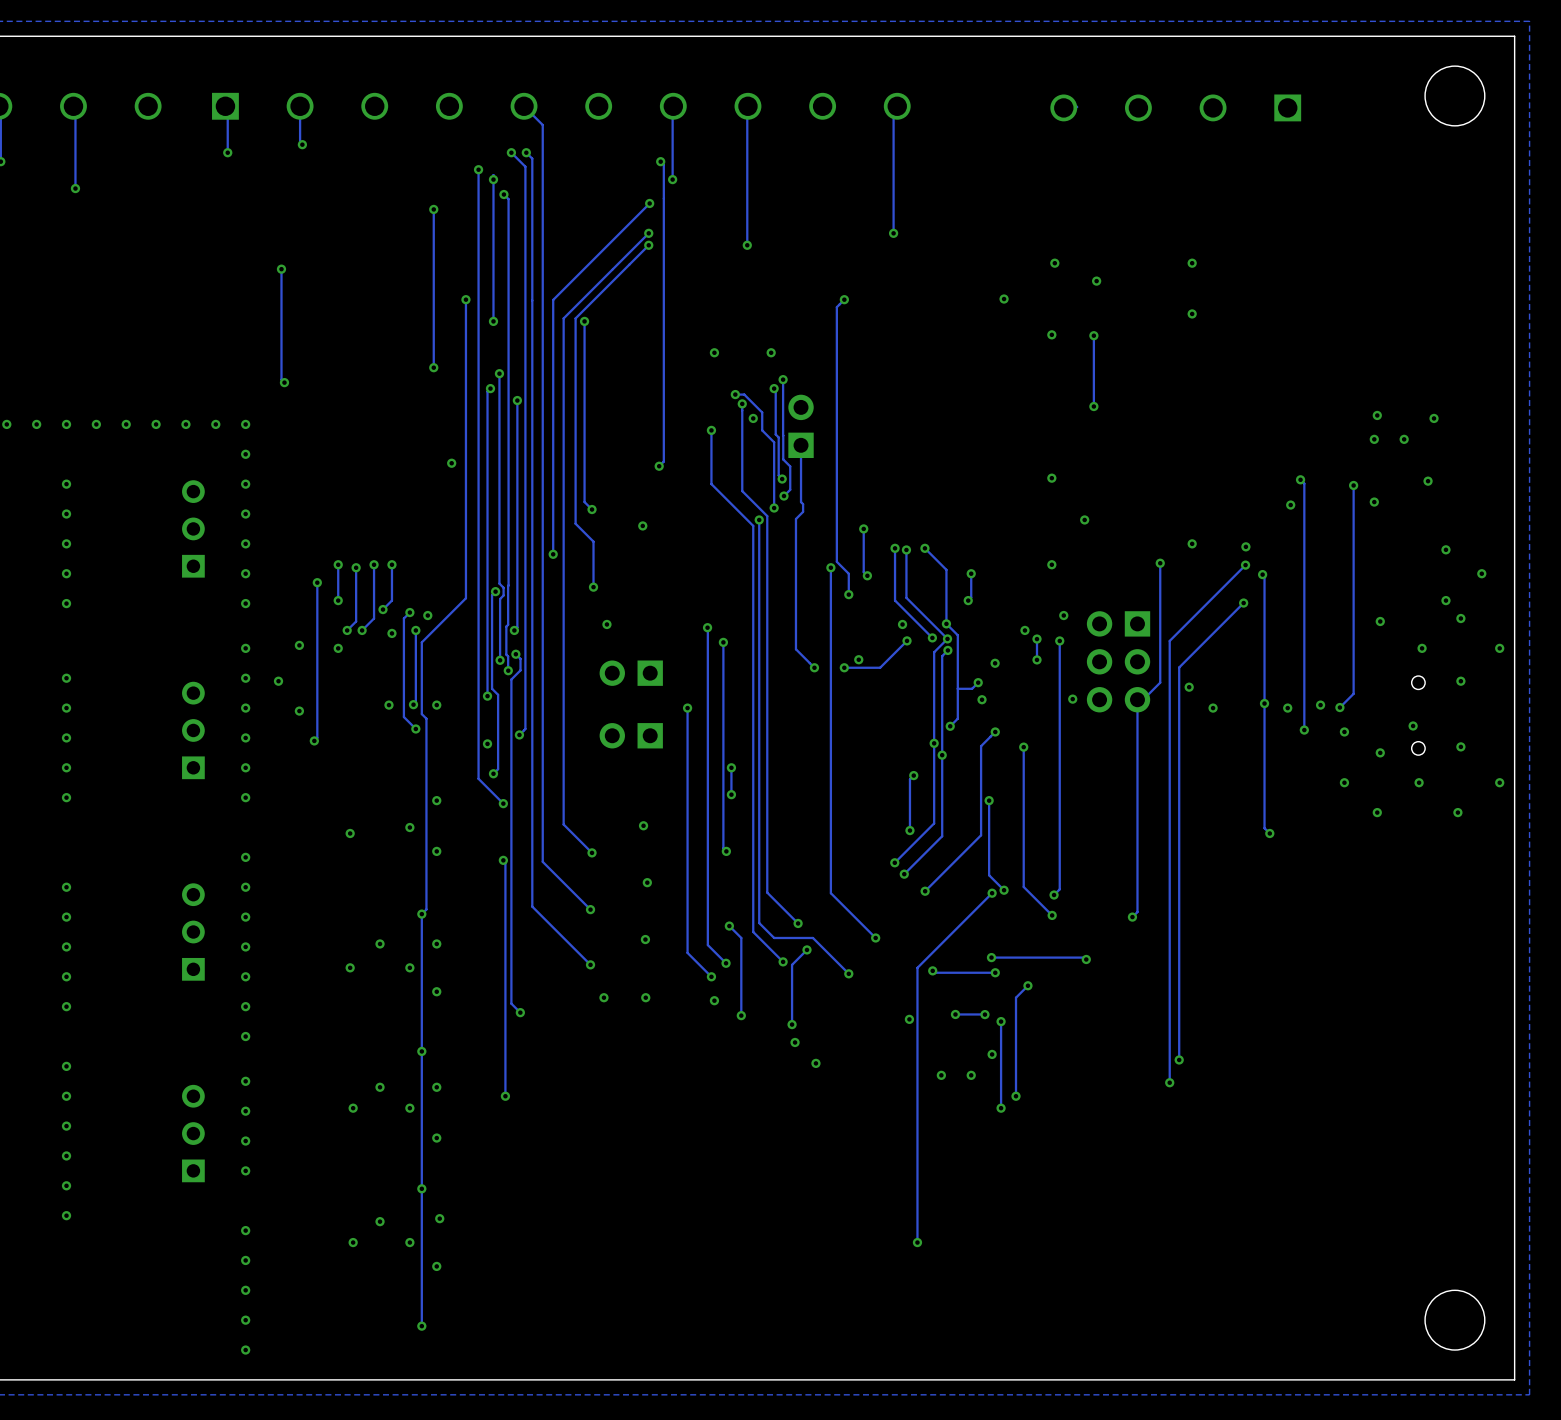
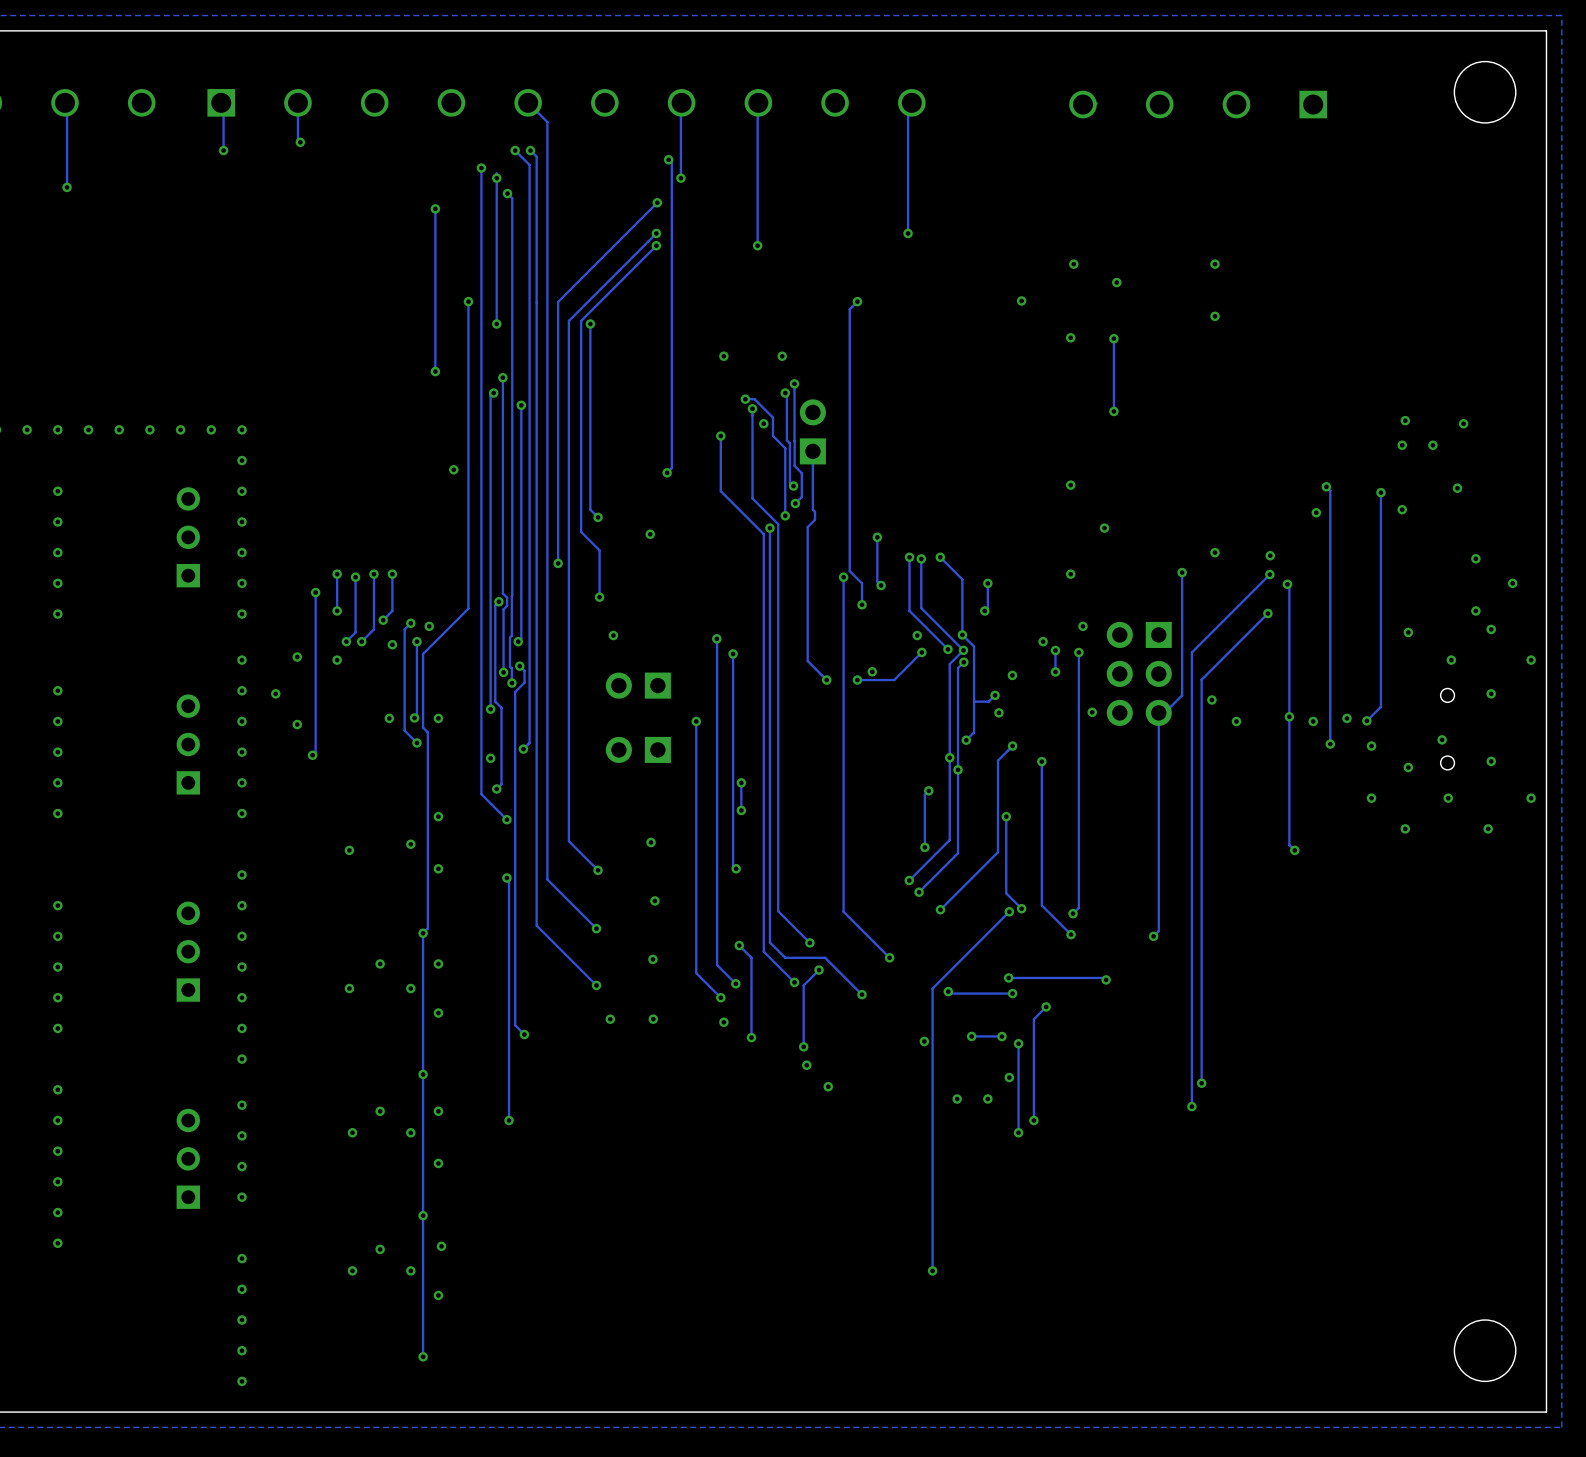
track: (281, 269) (281, 379) (284, 382) -> none
via: (281, 269) -> none
via: (284, 382) -> none

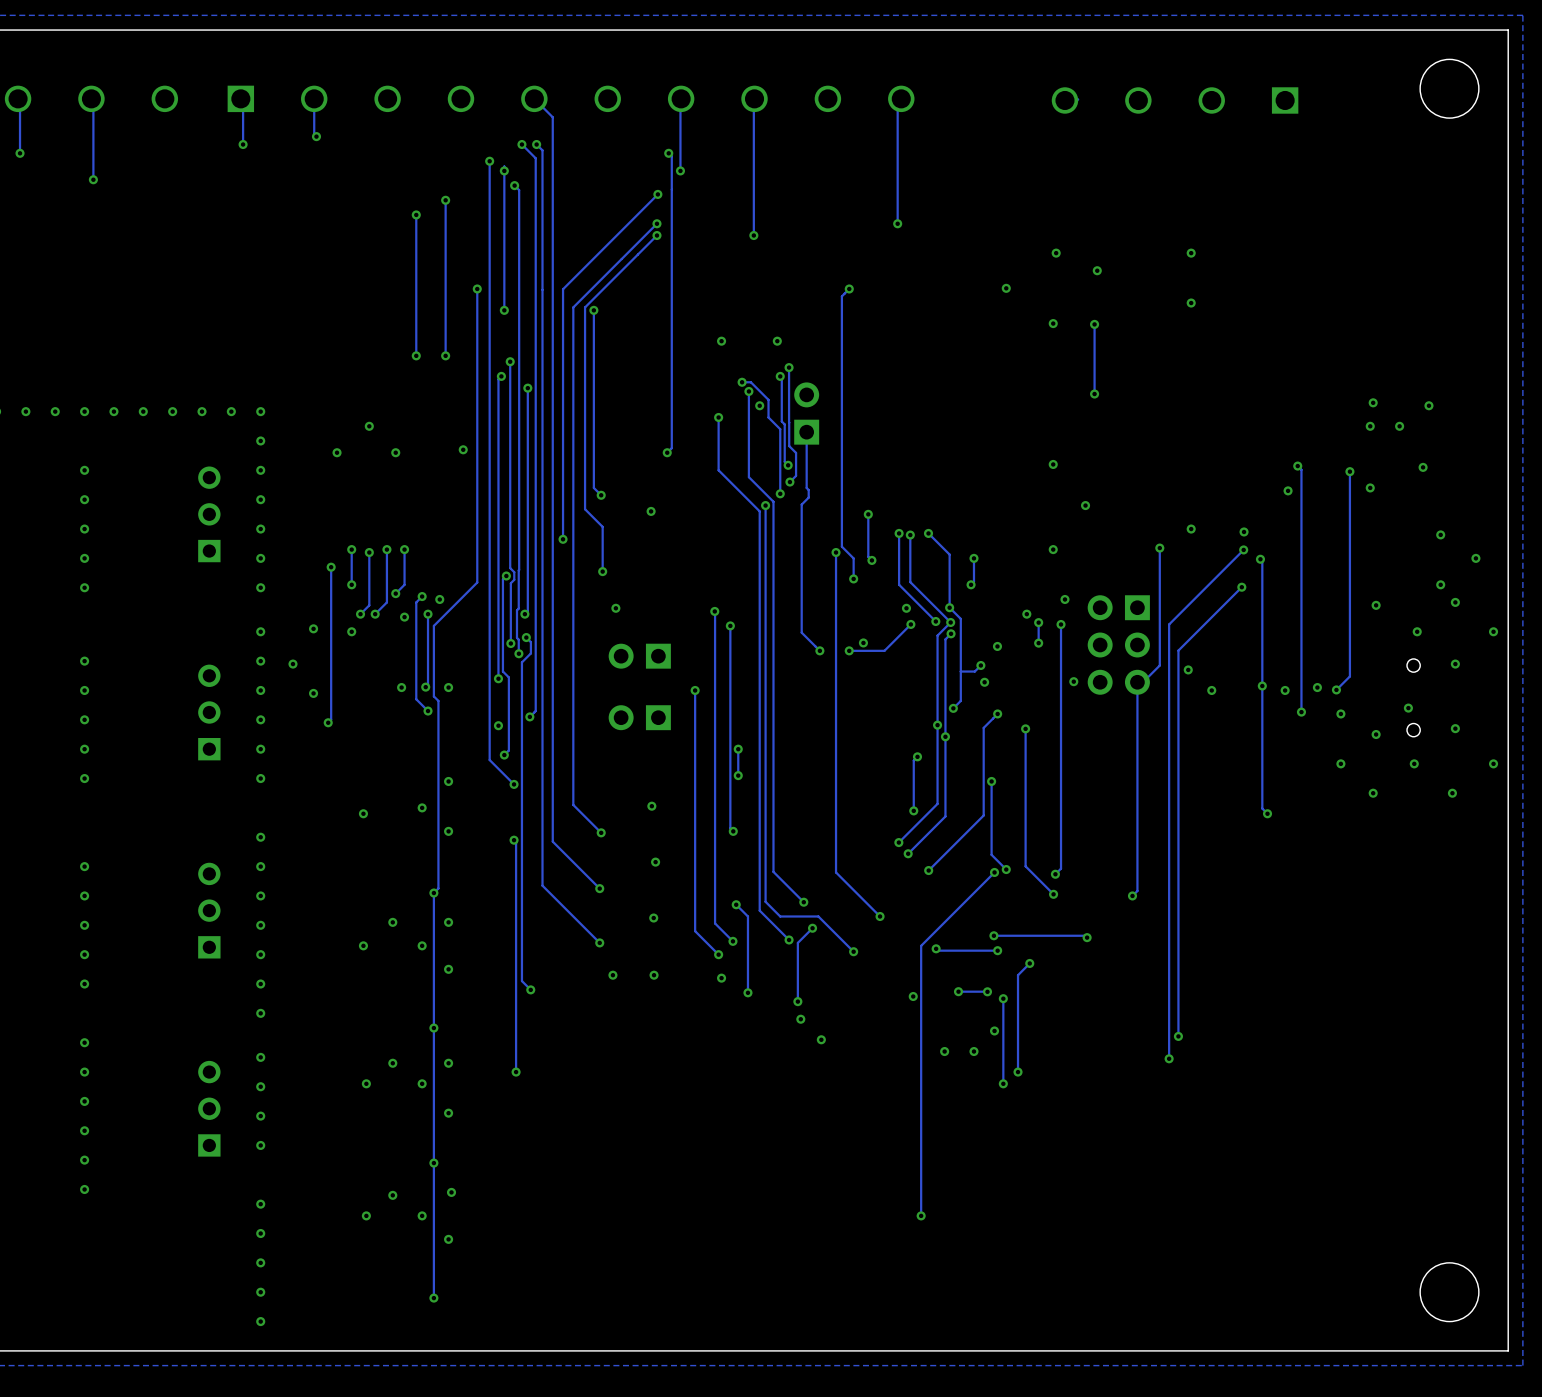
track: none -> (416, 214) (416, 355)
via: none -> (416, 214)
via: none -> (416, 355)
via: none -> (369, 426)
via: none -> (337, 452)
via: none -> (395, 452)

